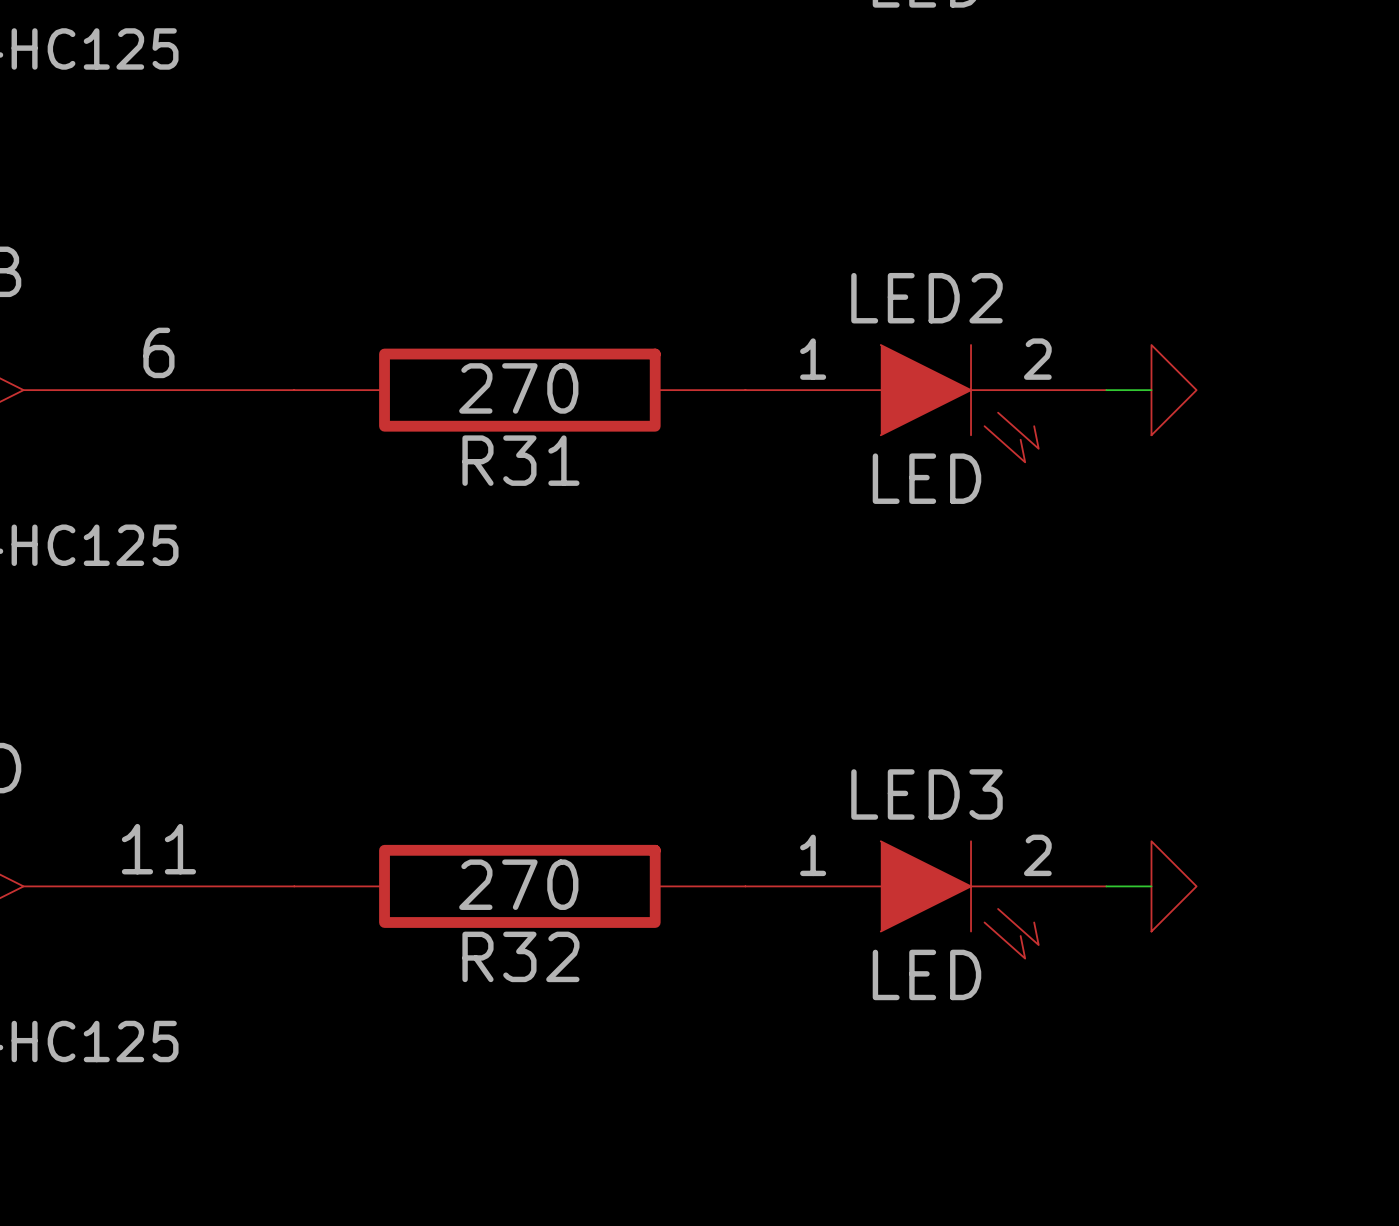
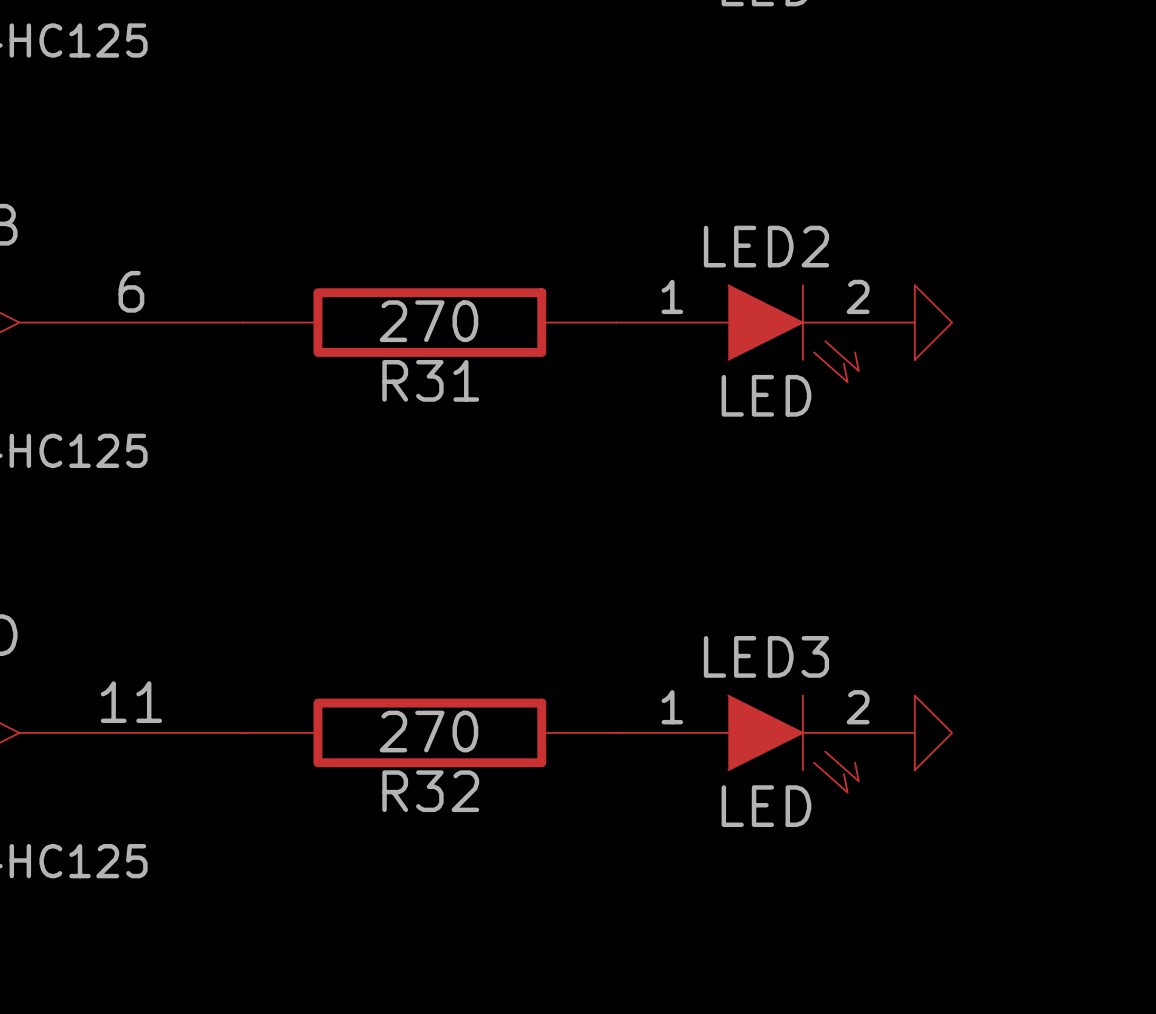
wire: (1106, 390) (1151, 390) -> none
power symbol position: (1174, 390) -> (933, 322)
wire: (1106, 886) (1151, 886) -> none
power symbol position: (1174, 886) -> (933, 732)

